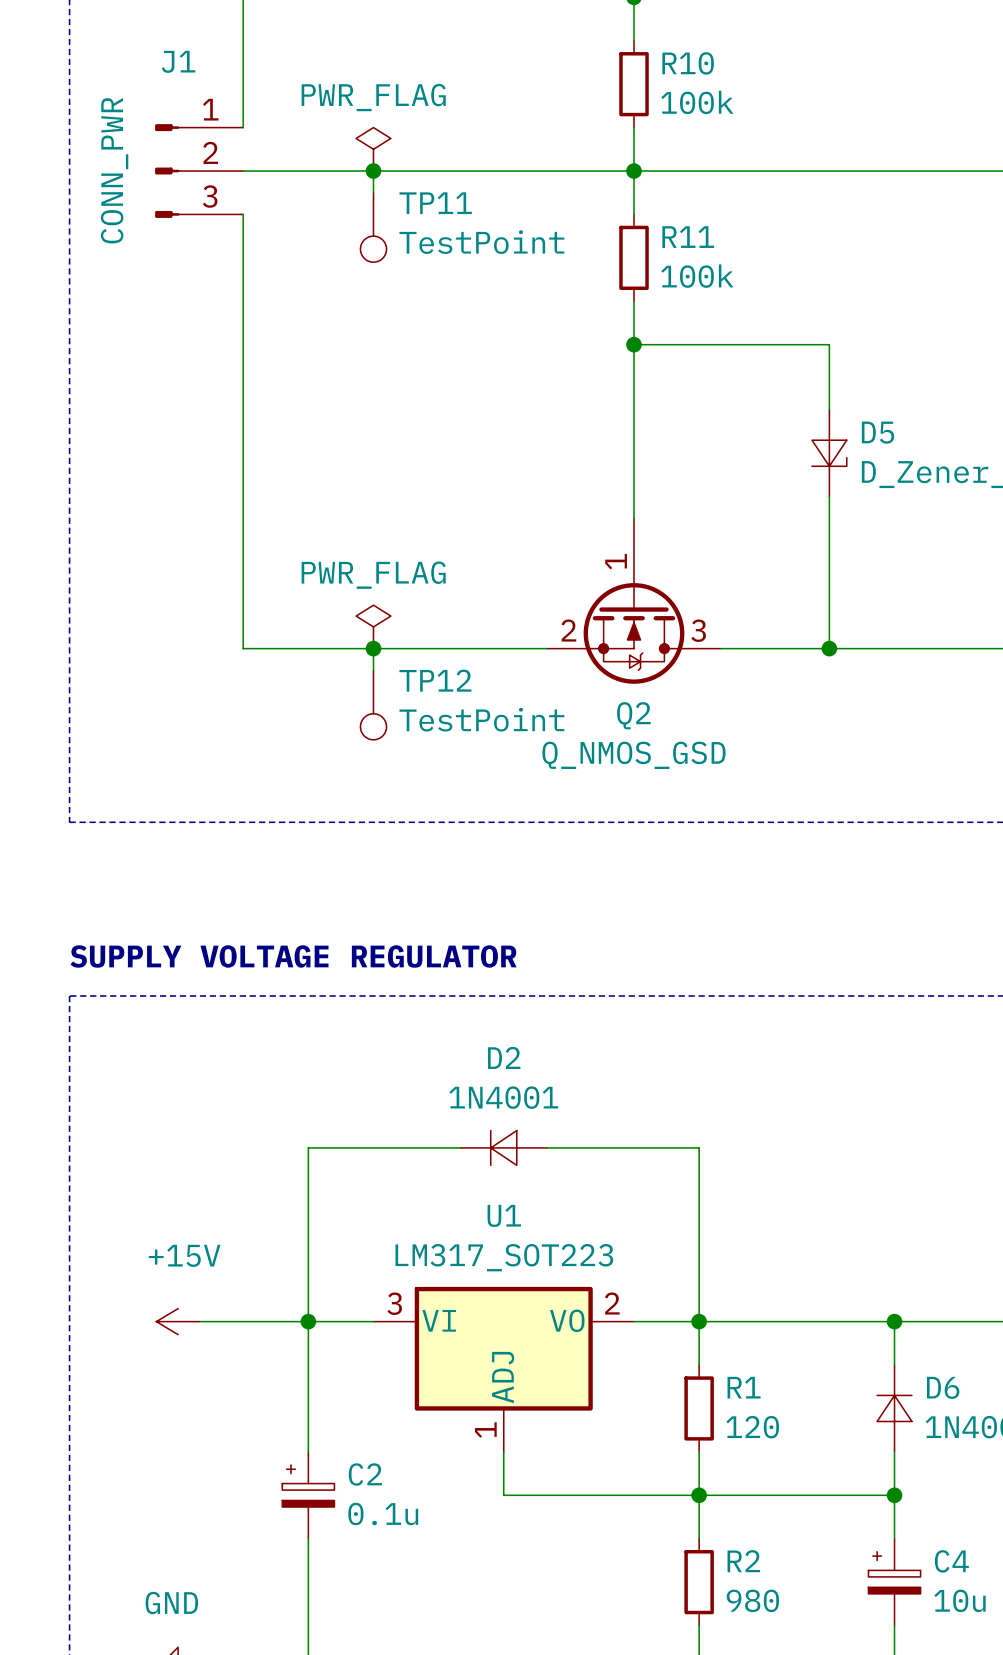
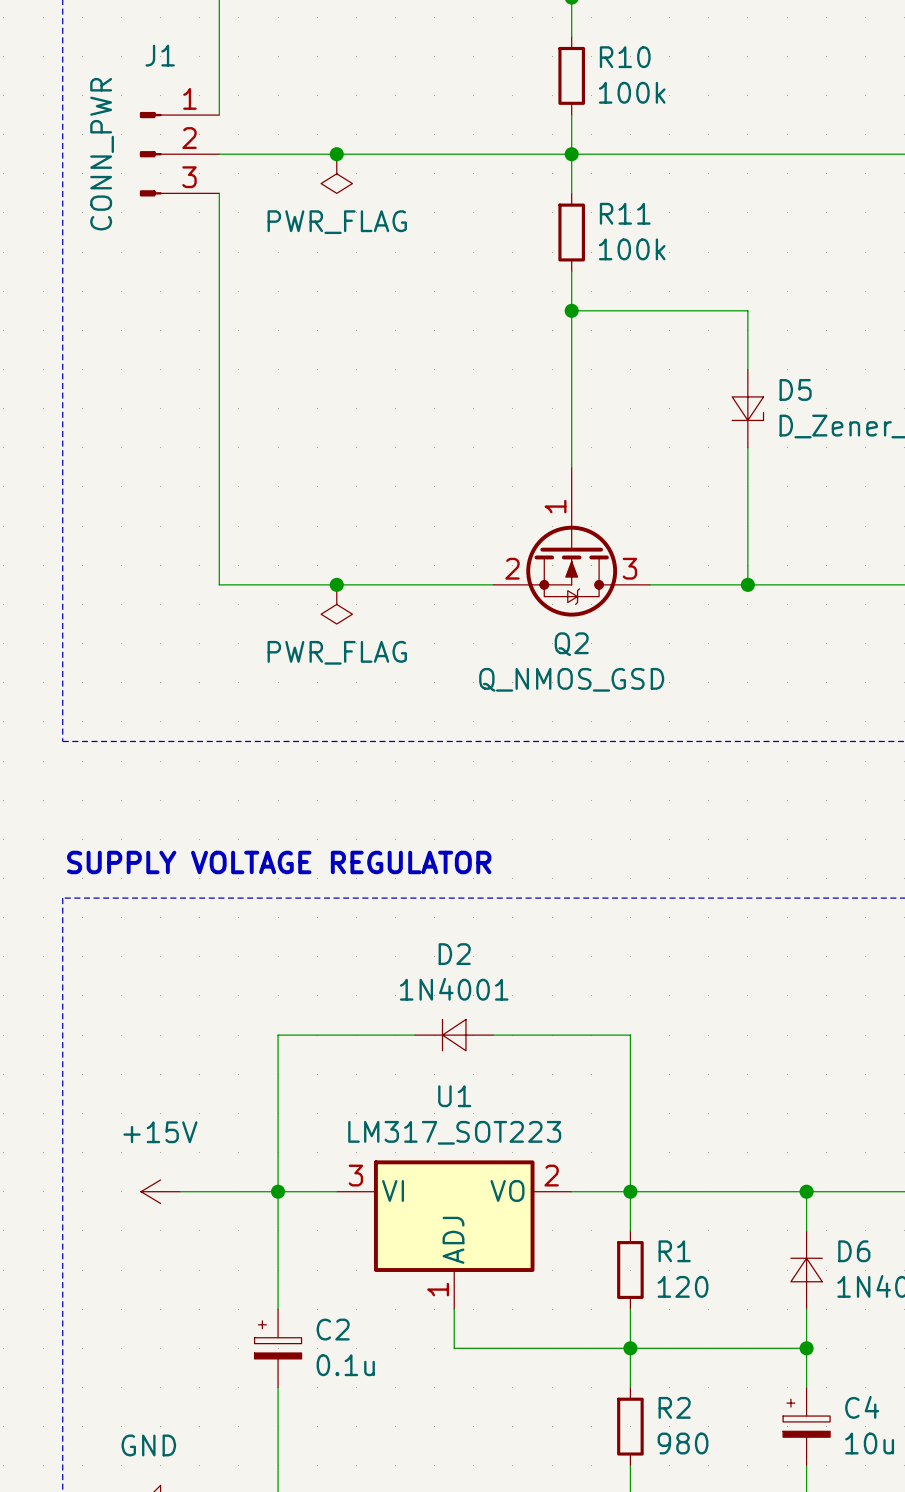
power symbol rotation: 0° (373, 149) -> 180° (336, 173)
power symbol position: PWR_FLAG (373, 149) -> PWR_FLAG (336, 173)
TP11: TestPoint (373, 227) -> none
power symbol rotation: 0° (373, 626) -> 180° (336, 604)
power symbol position: PWR_FLAG (373, 626) -> PWR_FLAG (336, 604)
TP12: TestPoint (373, 705) -> none

